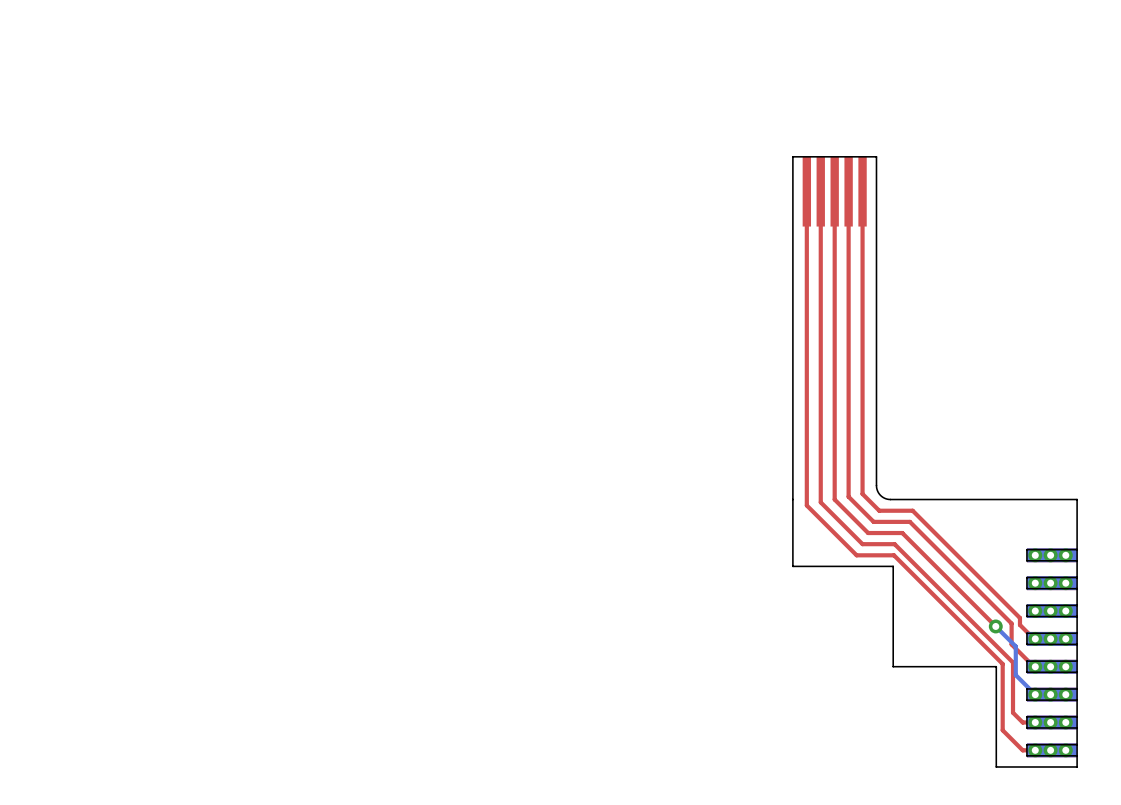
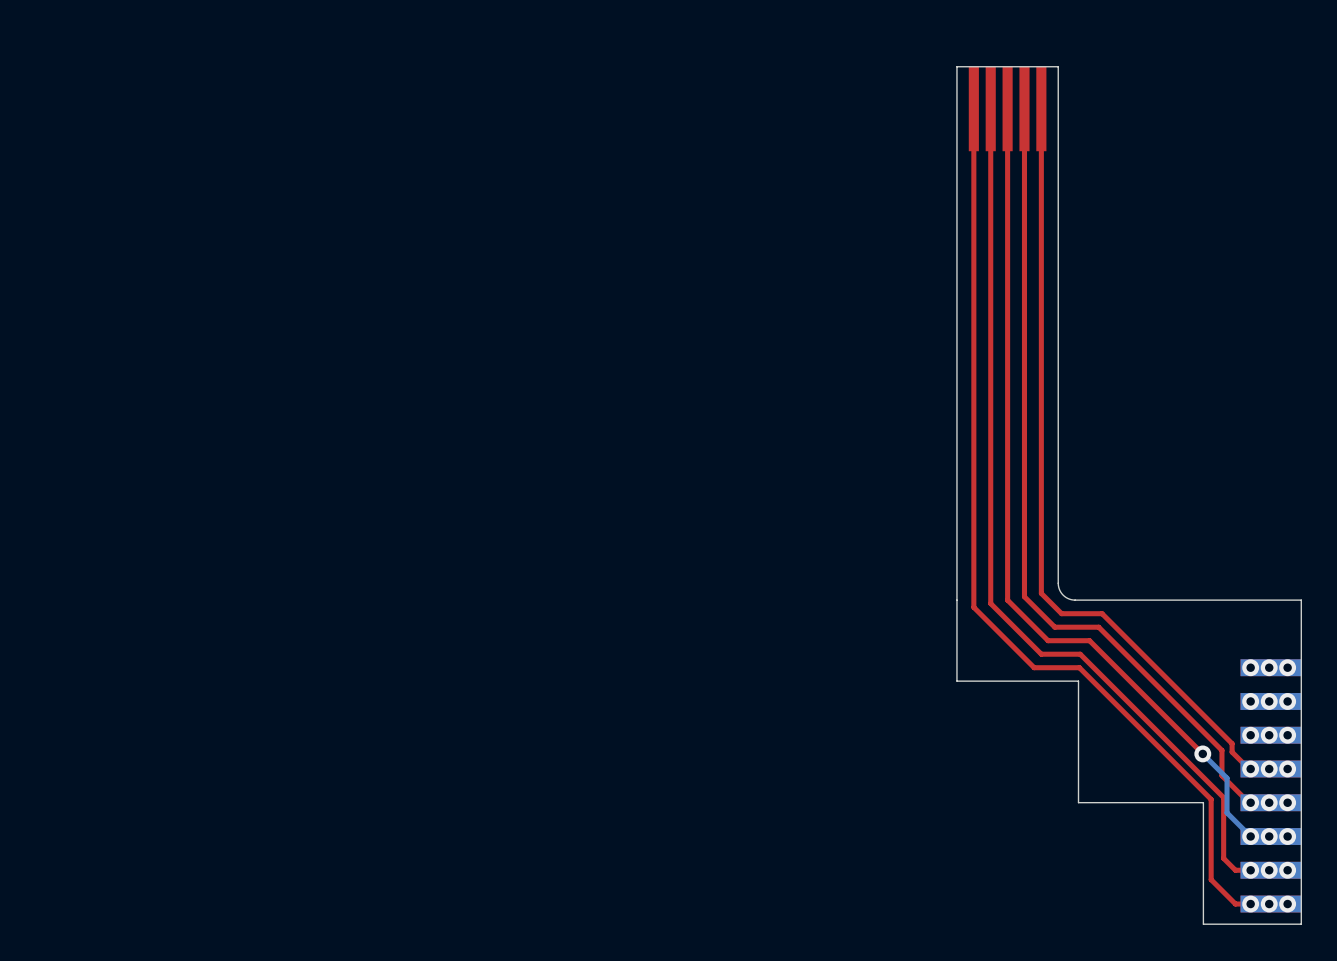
top track: none -> (973, 109) (973, 262)
top track: none -> (1041, 109) (1041, 265)
top track: none -> (1007, 110) (1007, 262)
top track: none -> (990, 112) (990, 262)
top track: none -> (1024, 114) (1024, 262)
board edge: (876, 156) (792, 156) -> (1058, 184) (1058, 66) (956, 66) (956, 184)
part position: (834, 191) -> (1007, 109)
board edge: (1077, 549) (1026, 549) (1026, 560) (1077, 560) -> none
board edge: (1077, 577) (1026, 577) (1026, 588) (1077, 588) -> none
board edge: (1077, 605) (1026, 605) (1026, 616) (1077, 616) -> none
board edge: (1077, 633) (1026, 633) (1026, 644) (1077, 644) -> none
board edge: (1077, 661) (1026, 661) (1026, 672) (1077, 672) -> none
board edge: (1077, 688) (1026, 688) (1026, 700) (1077, 700) -> none
board edge: (1077, 716) (1026, 716) (1026, 727) (1077, 727) -> none
board edge: (1077, 744) (1026, 744) (1026, 755) (1077, 755) -> none

